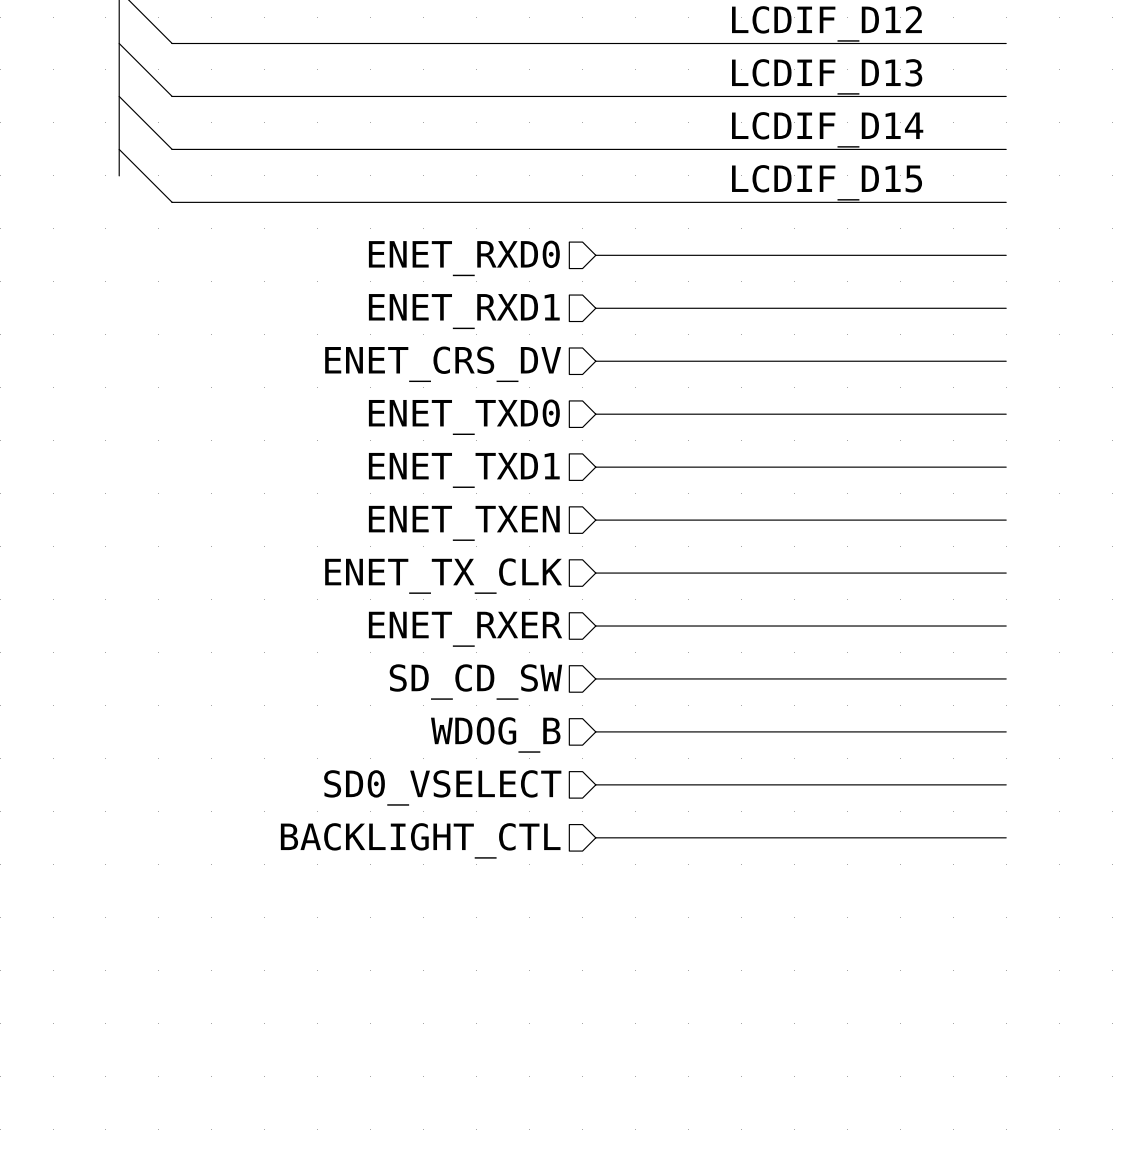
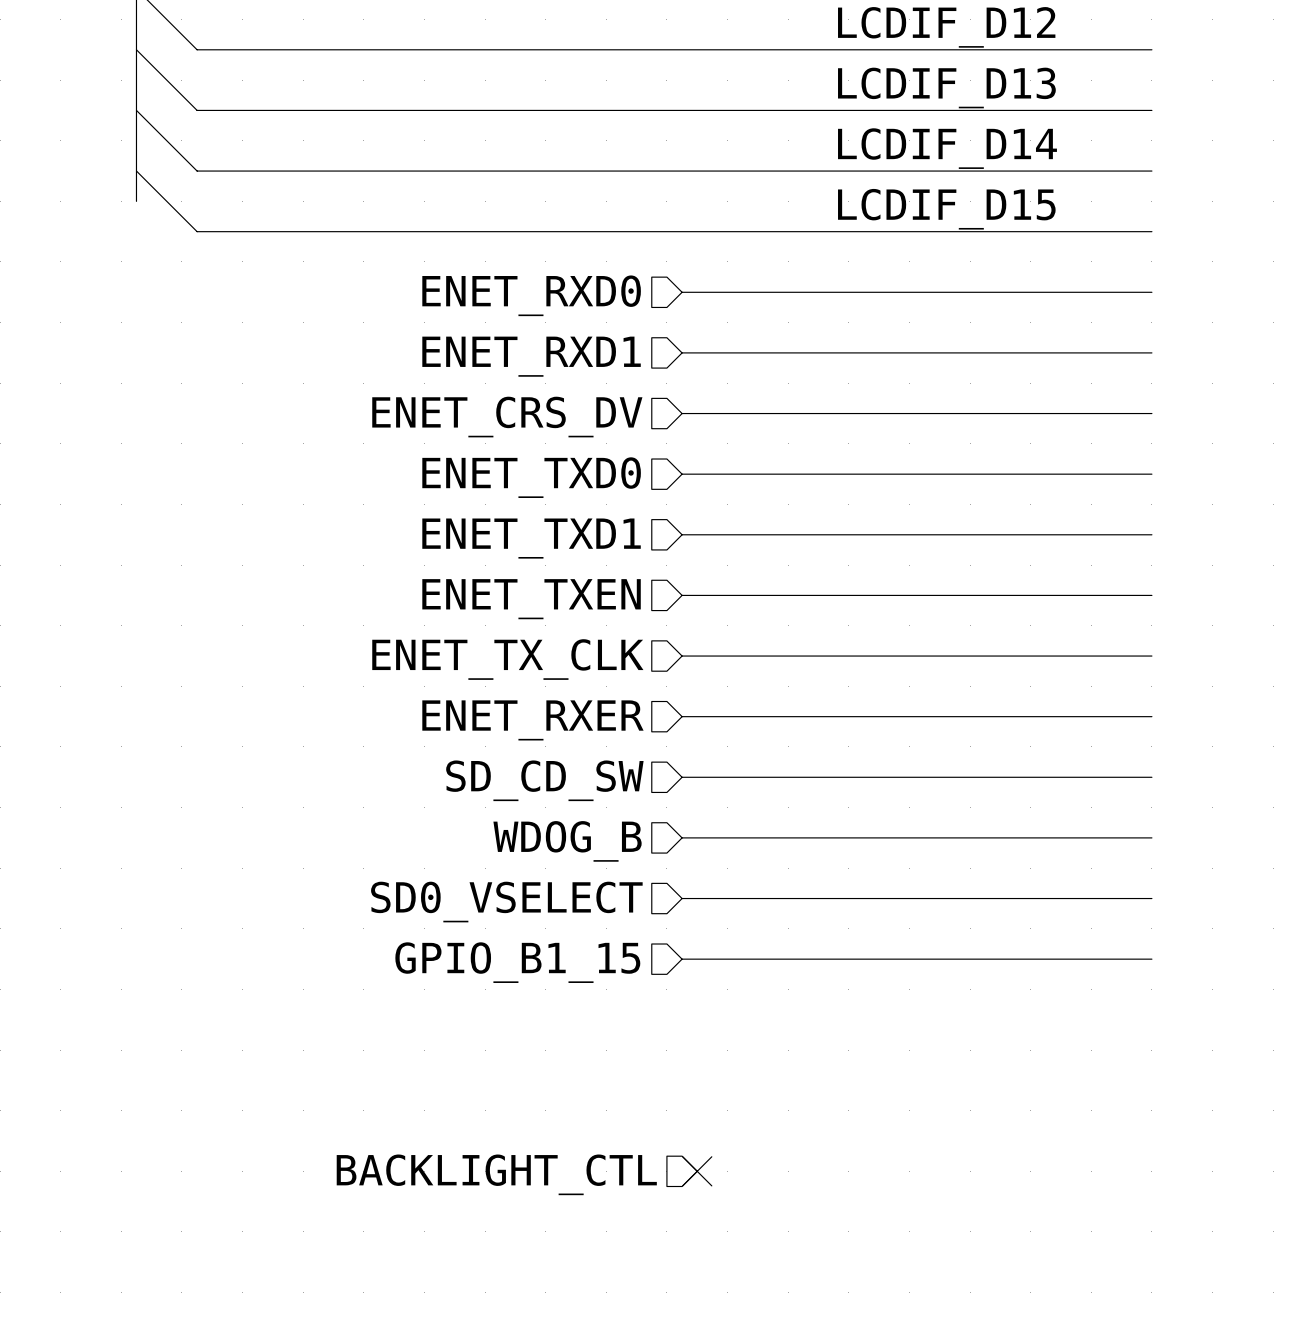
hierarchical label: BACKLIGHT_CTL (420, 840) -> GPIO_B1_15 (517, 962)
no-connect mark: none -> (697, 1171)
hierarchical label: none -> BACKLIGHT_CTL (496, 1174)

